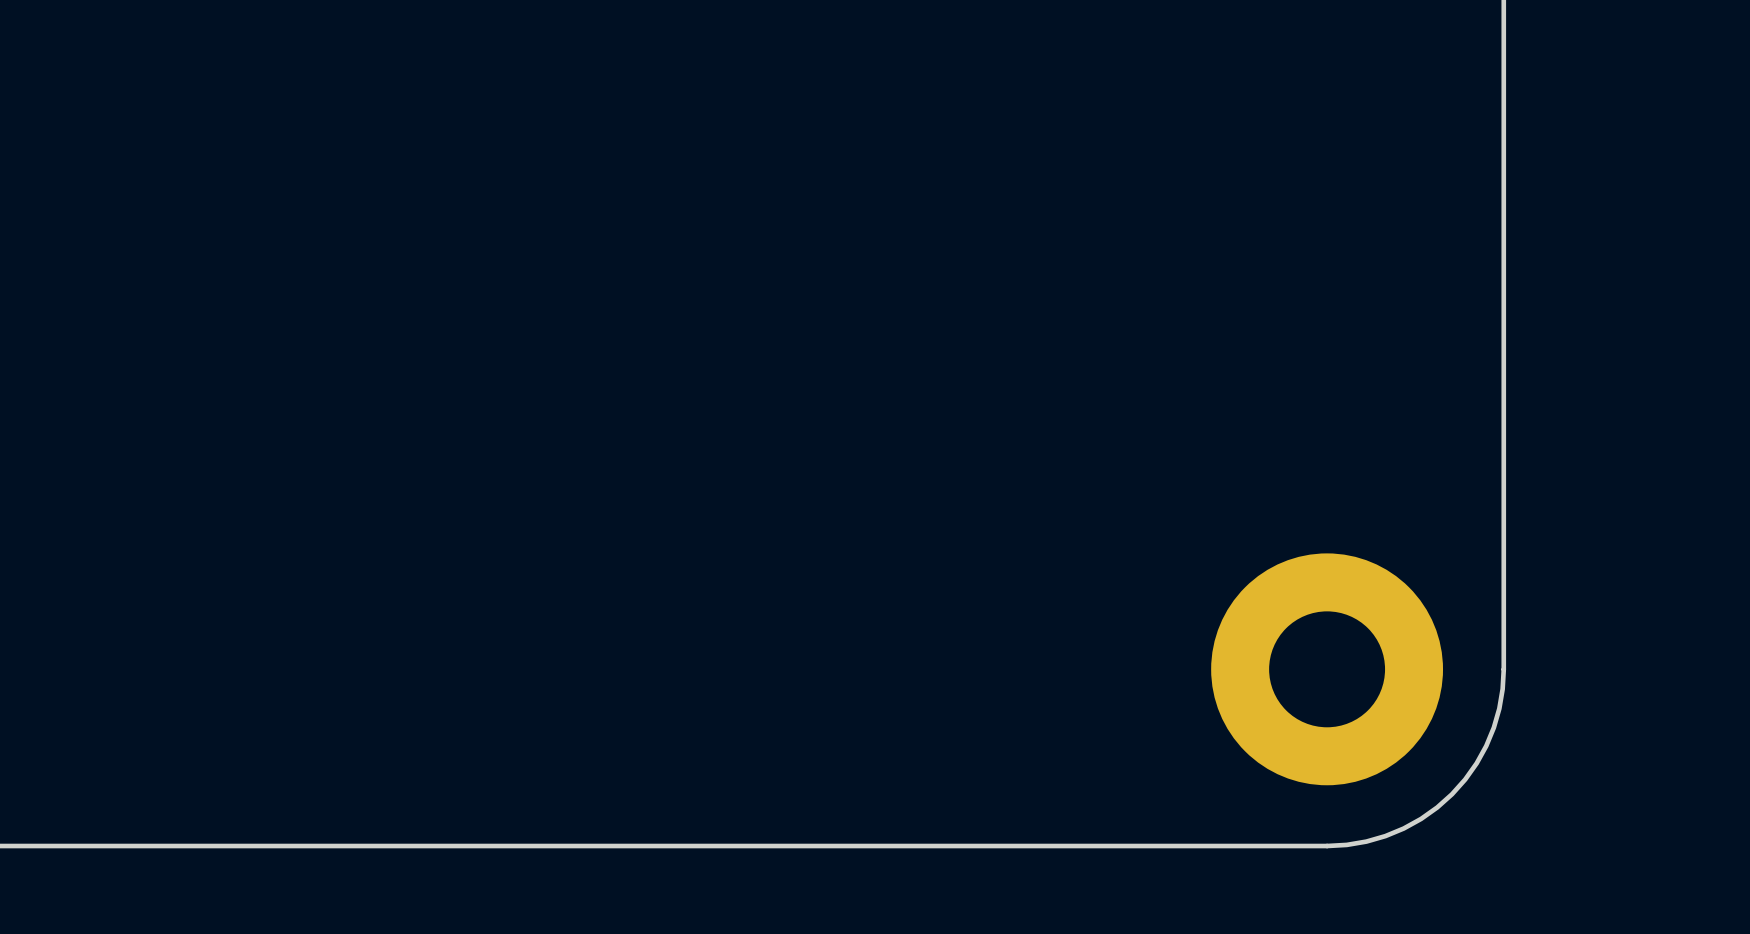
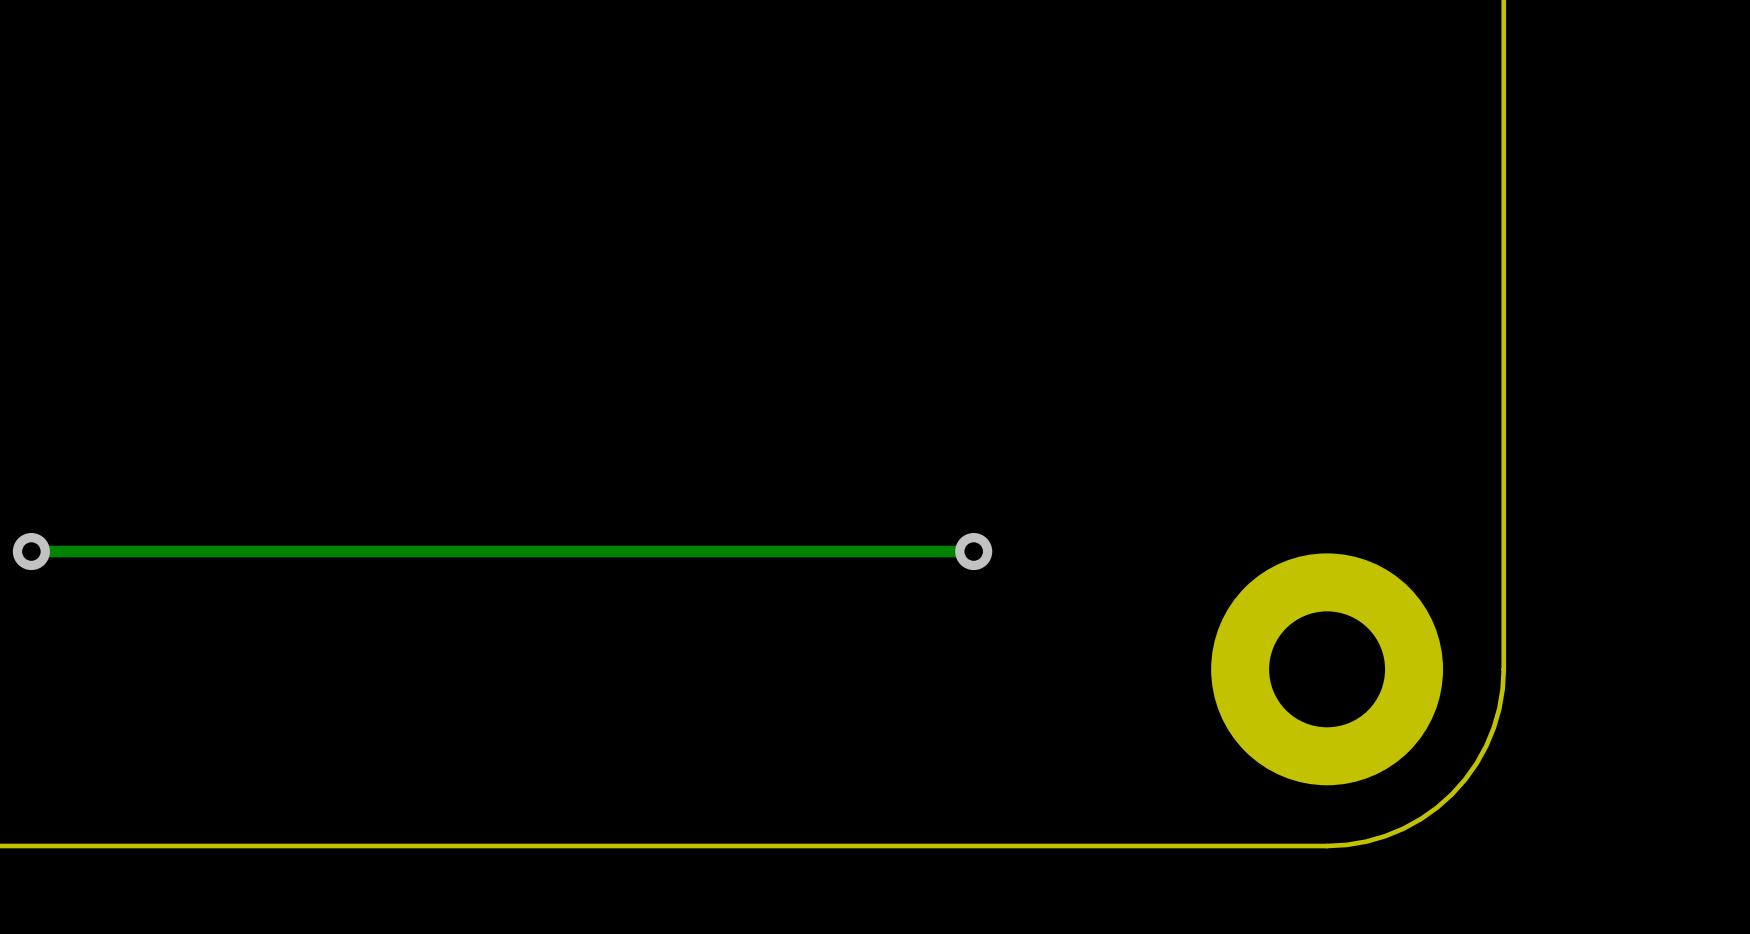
via: none -> (31, 551)
track: none -> (973, 551) (31, 551)
via: none -> (973, 551)

